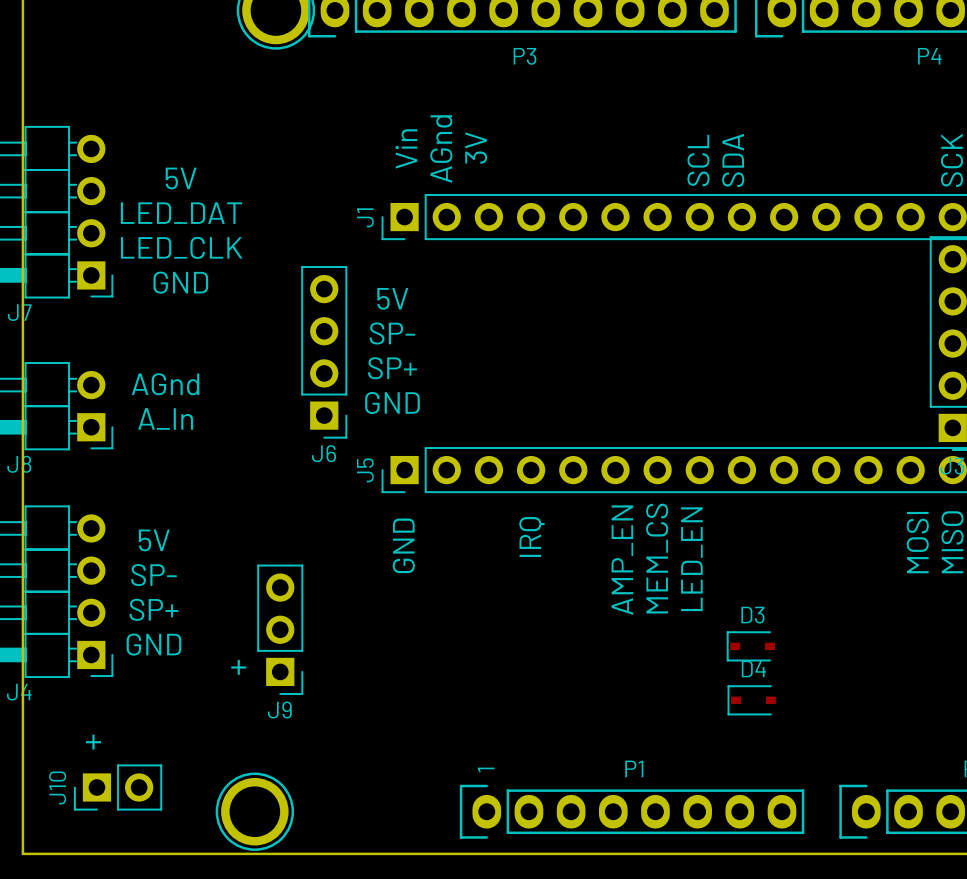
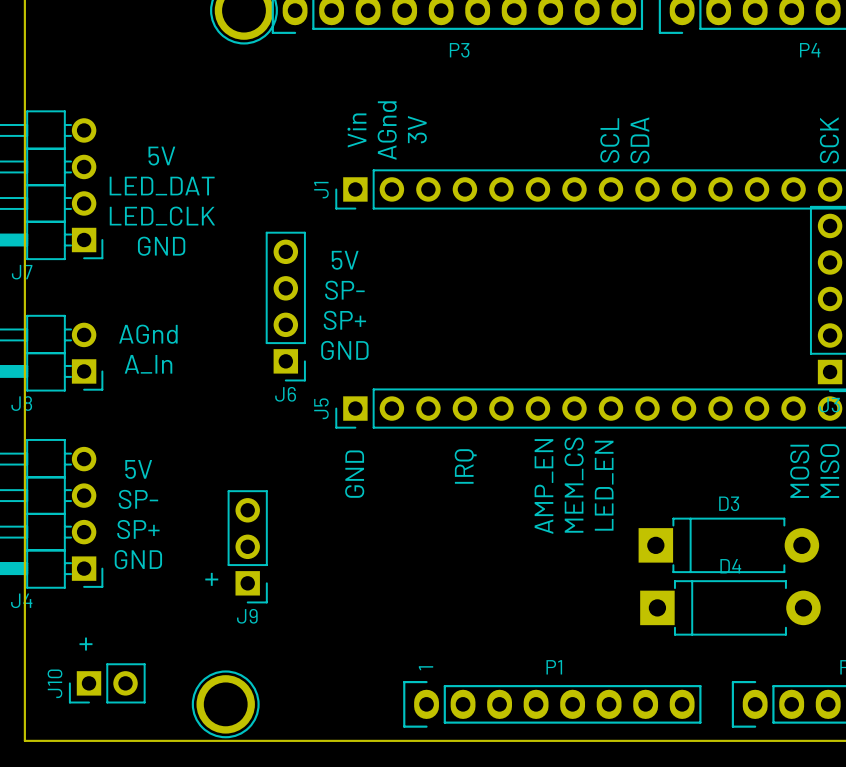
D3 footprint: [726, 631, 776, 662] -> [638, 517, 820, 573]
D4 footprint: [727, 685, 776, 716] -> [640, 580, 821, 636]

